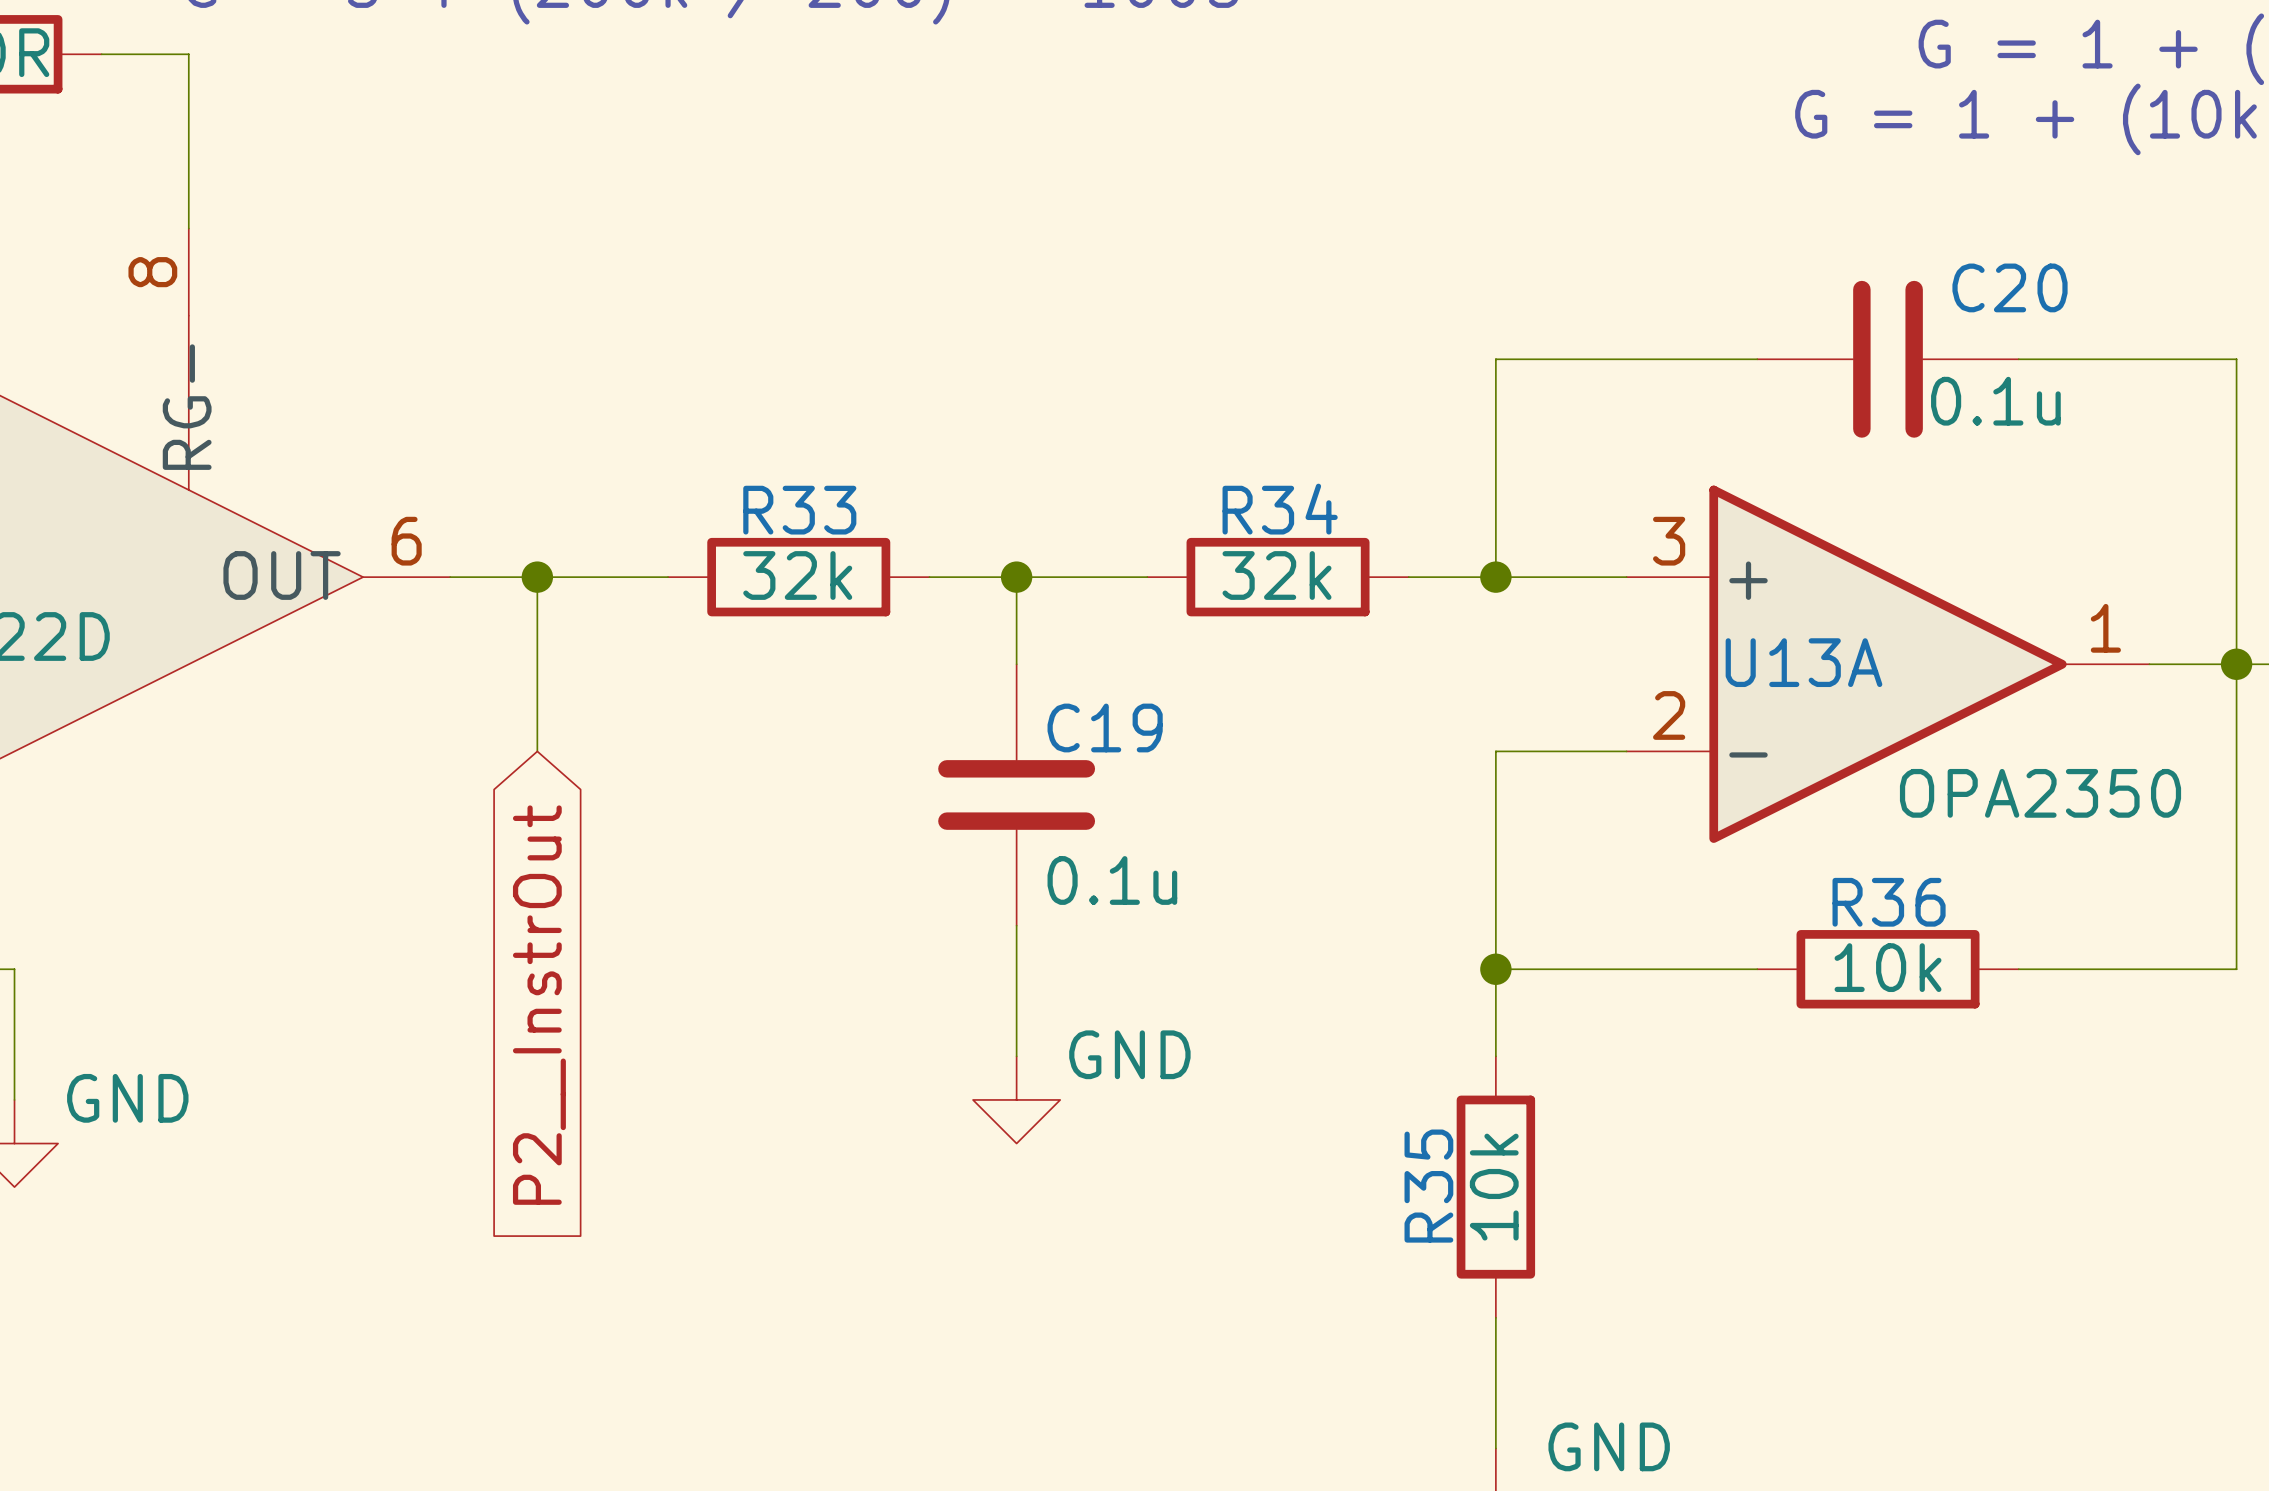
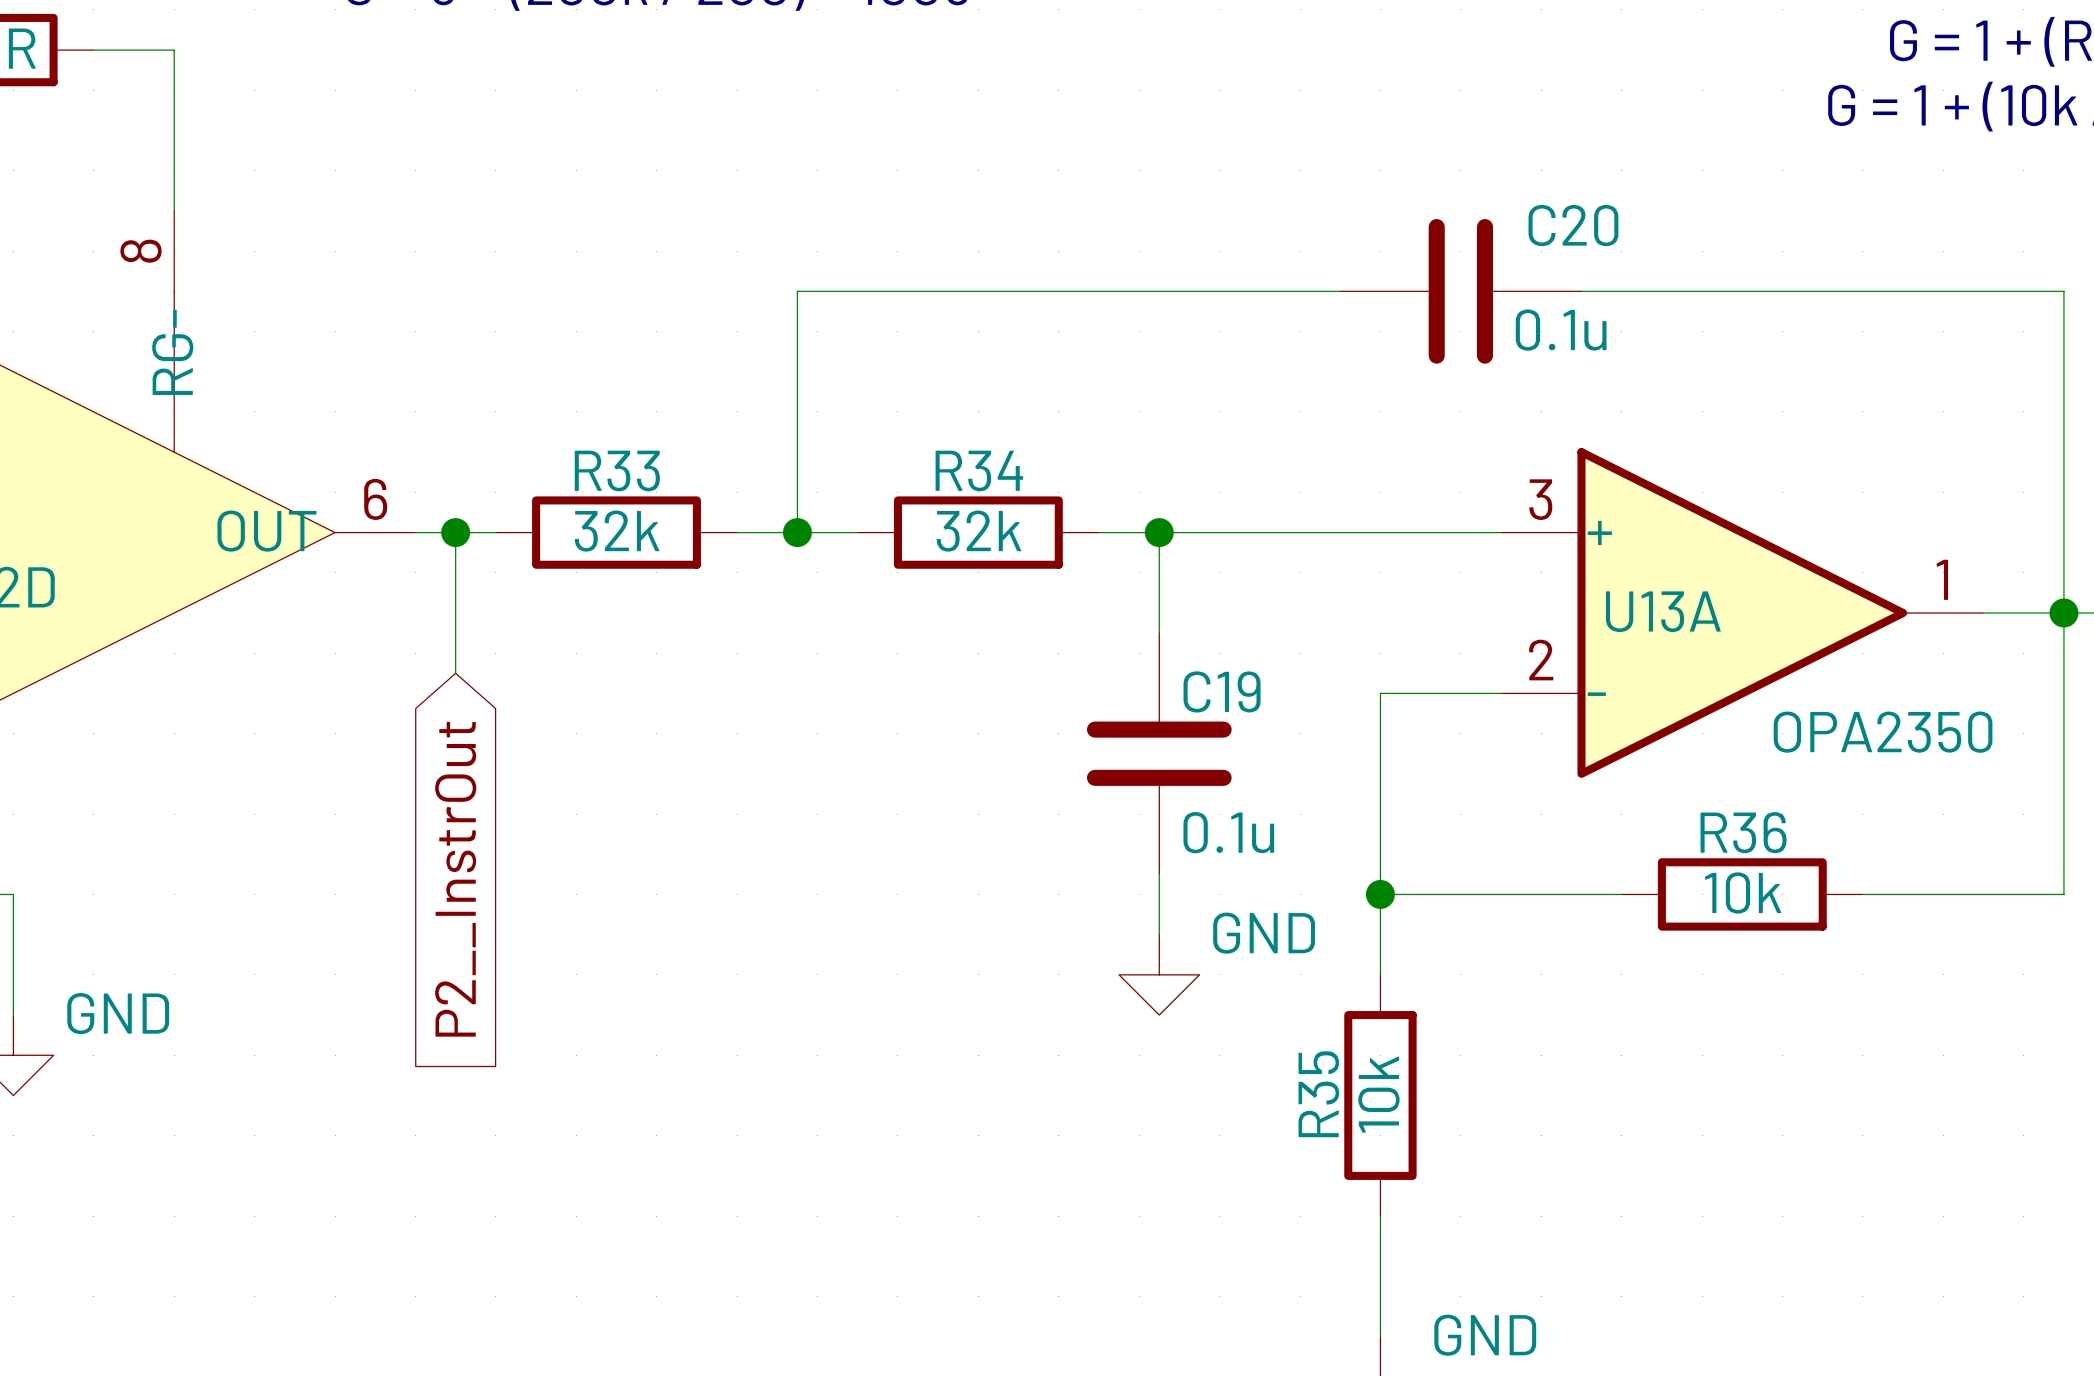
wire: none -> (1340, 291) (797, 291) (797, 532)
wire: (1757, 359) (1495, 359) (1495, 577) -> none
C20 position: (1888, 359) -> (1460, 291)
wire: (2018, 359) (2236, 359) -> (1581, 291) (2063, 291) (2063, 331)
wire: none -> (455, 532) (455, 673)
junction position: (537, 577) -> (455, 532)
wire: (668, 577) (537, 577) (537, 751) -> none
R33 position: (798, 577) -> (616, 532)
junction: none -> (797, 532)
wire: (929, 577) (1147, 577) -> (857, 532) (737, 532)
wire: (1016, 577) (1016, 664) -> none
junction: (1016, 577) -> none
wire: none -> (1098, 532) (1300, 532)
wire: none -> (1159, 532) (1159, 633)
junction: none -> (1159, 532)
R34 position: (1278, 577) -> (978, 532)
junction: (1495, 577) -> none
C19 position: (1016, 794) -> (1159, 753)
wire: (1016, 925) (1016, 1056) -> none
wire: none -> (1159, 874) (1159, 934)
global label position: P2__InstrOut (539, 1005) -> P2__InstrOut (455, 879)
power symbol position: GND (1016, 1099) -> GND (1159, 974)

